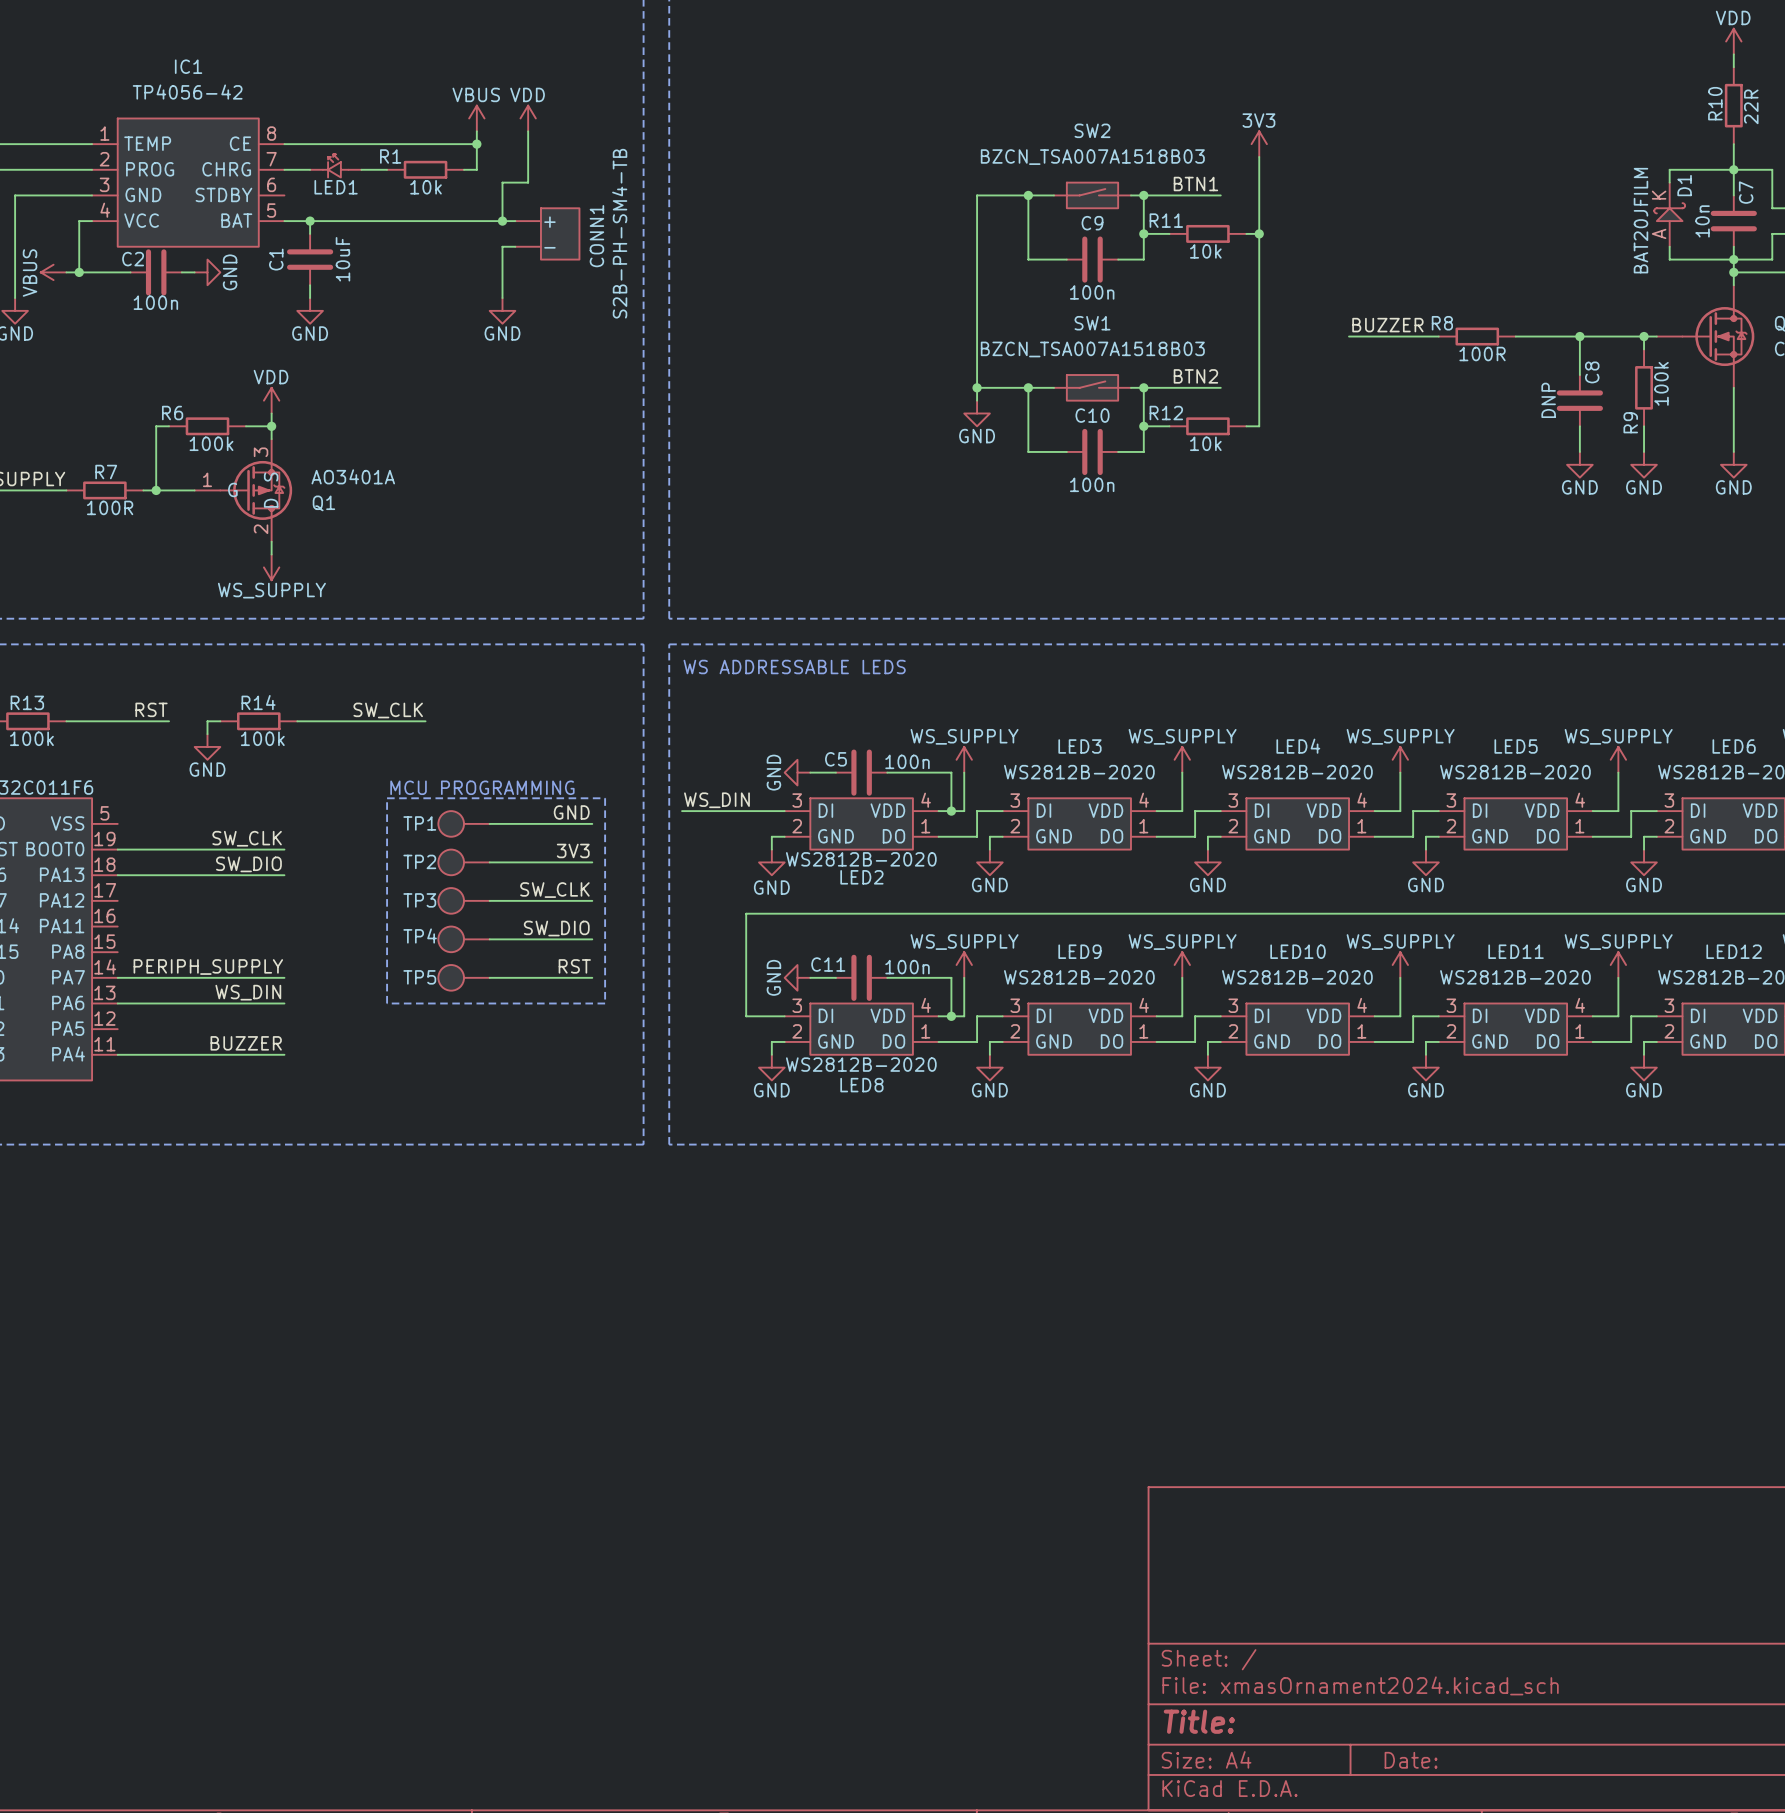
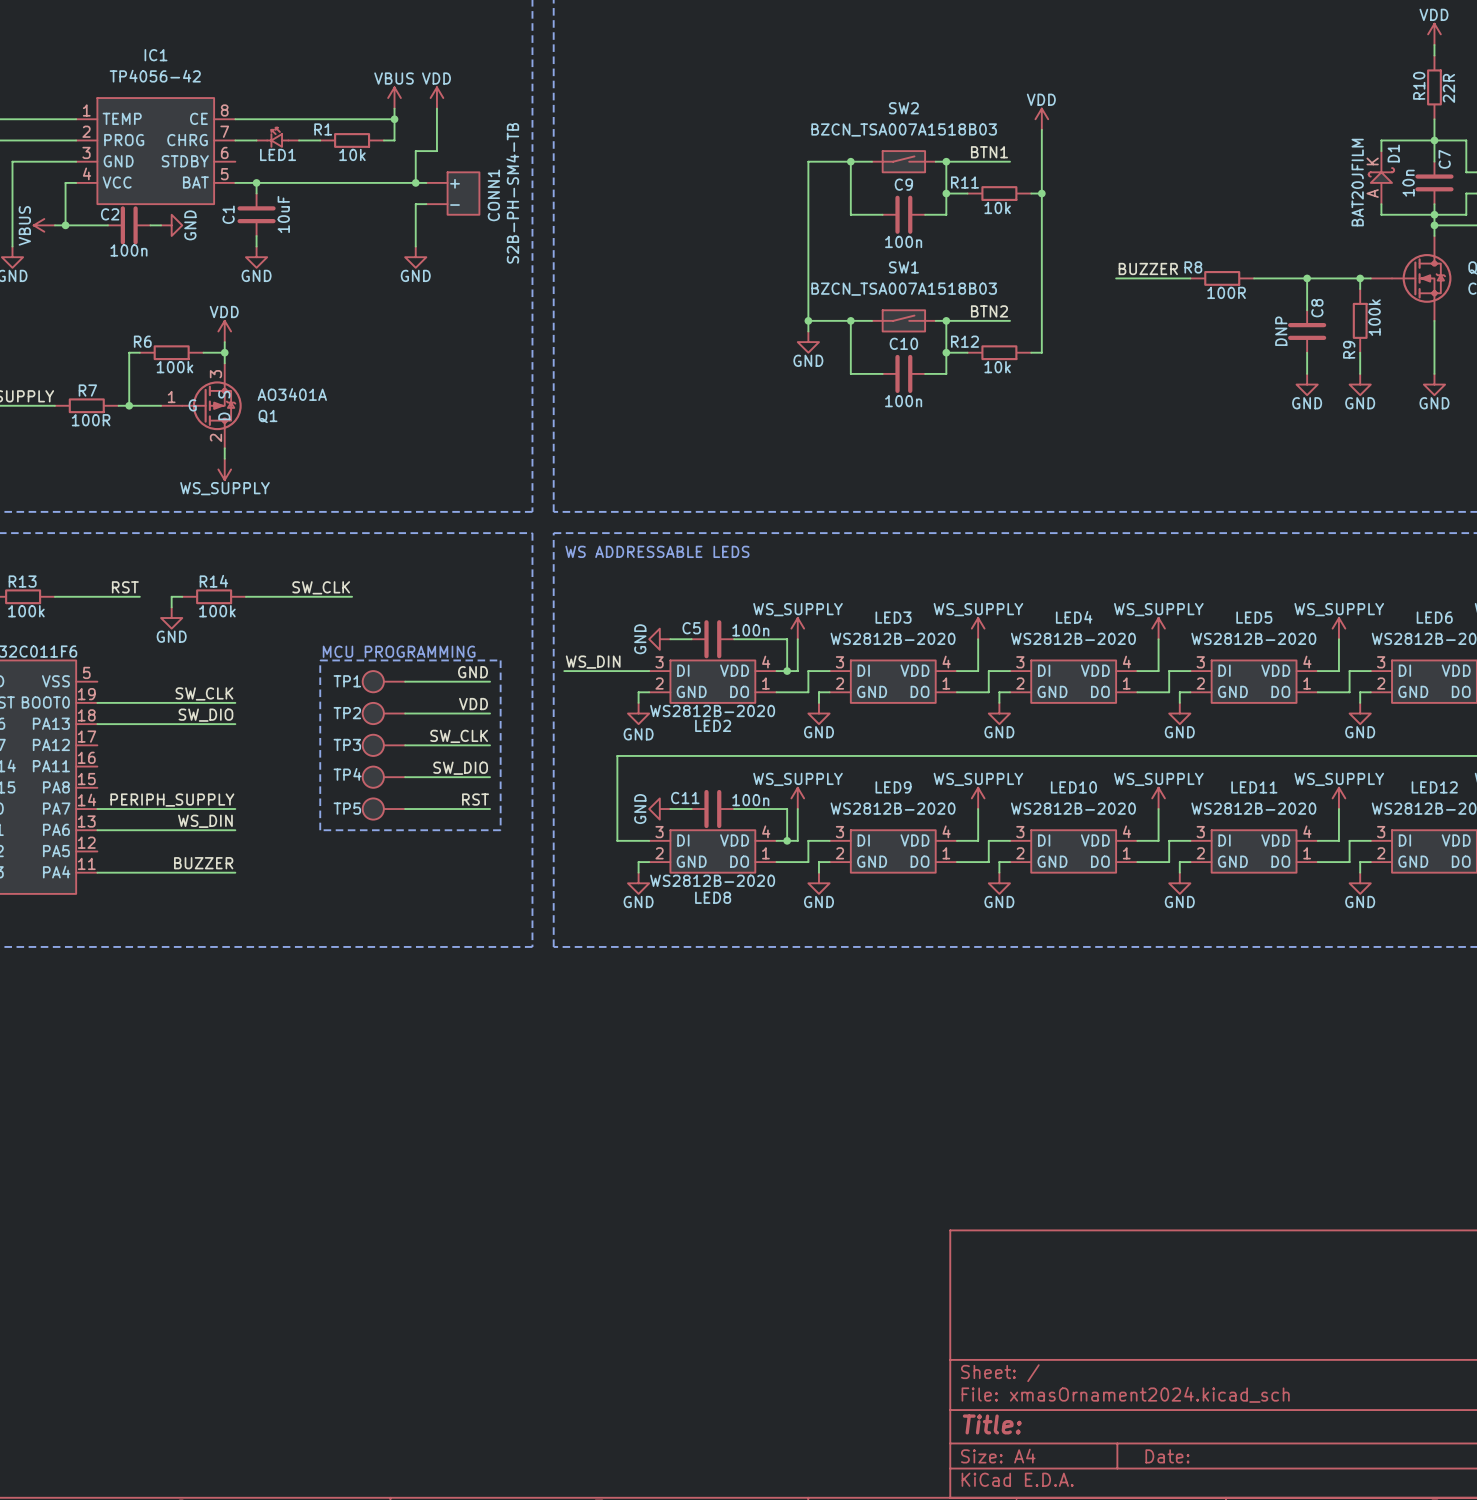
power symbol: 3V3 (1259, 144) -> VDD (1041, 119)
label: 3V3 (573, 850) -> VDD (473, 704)

